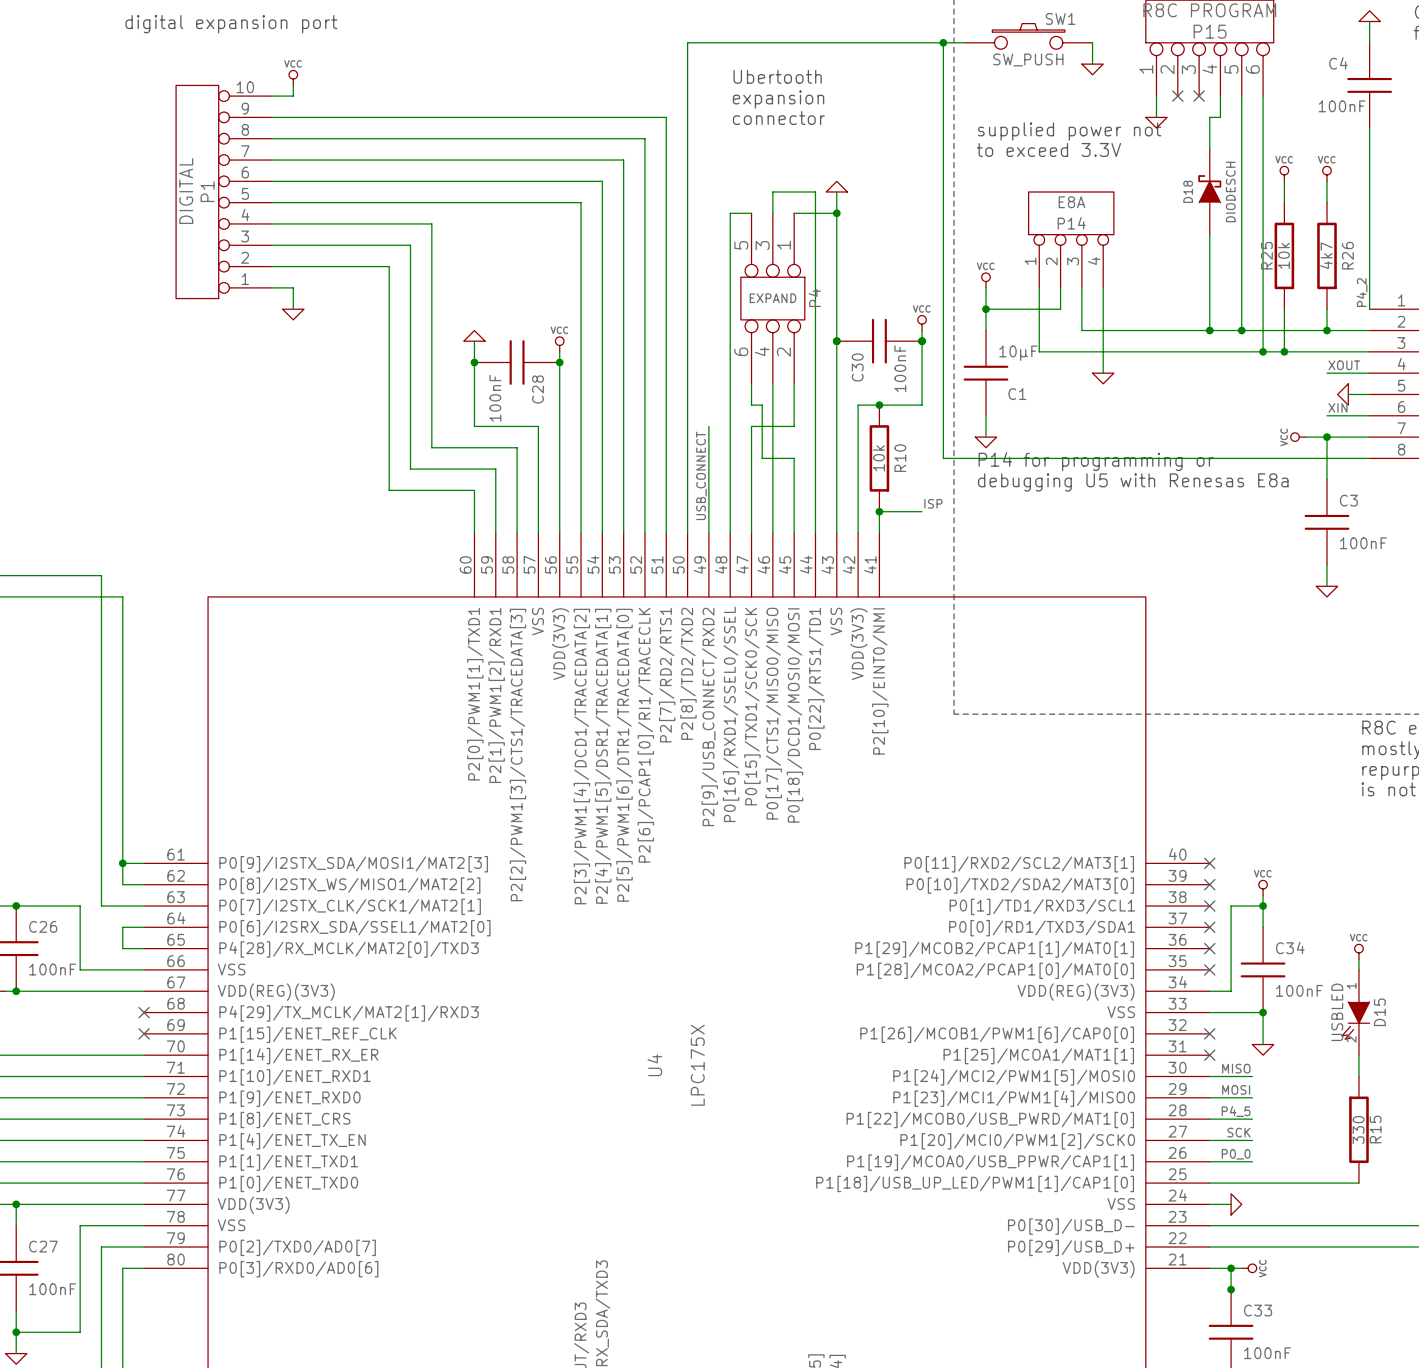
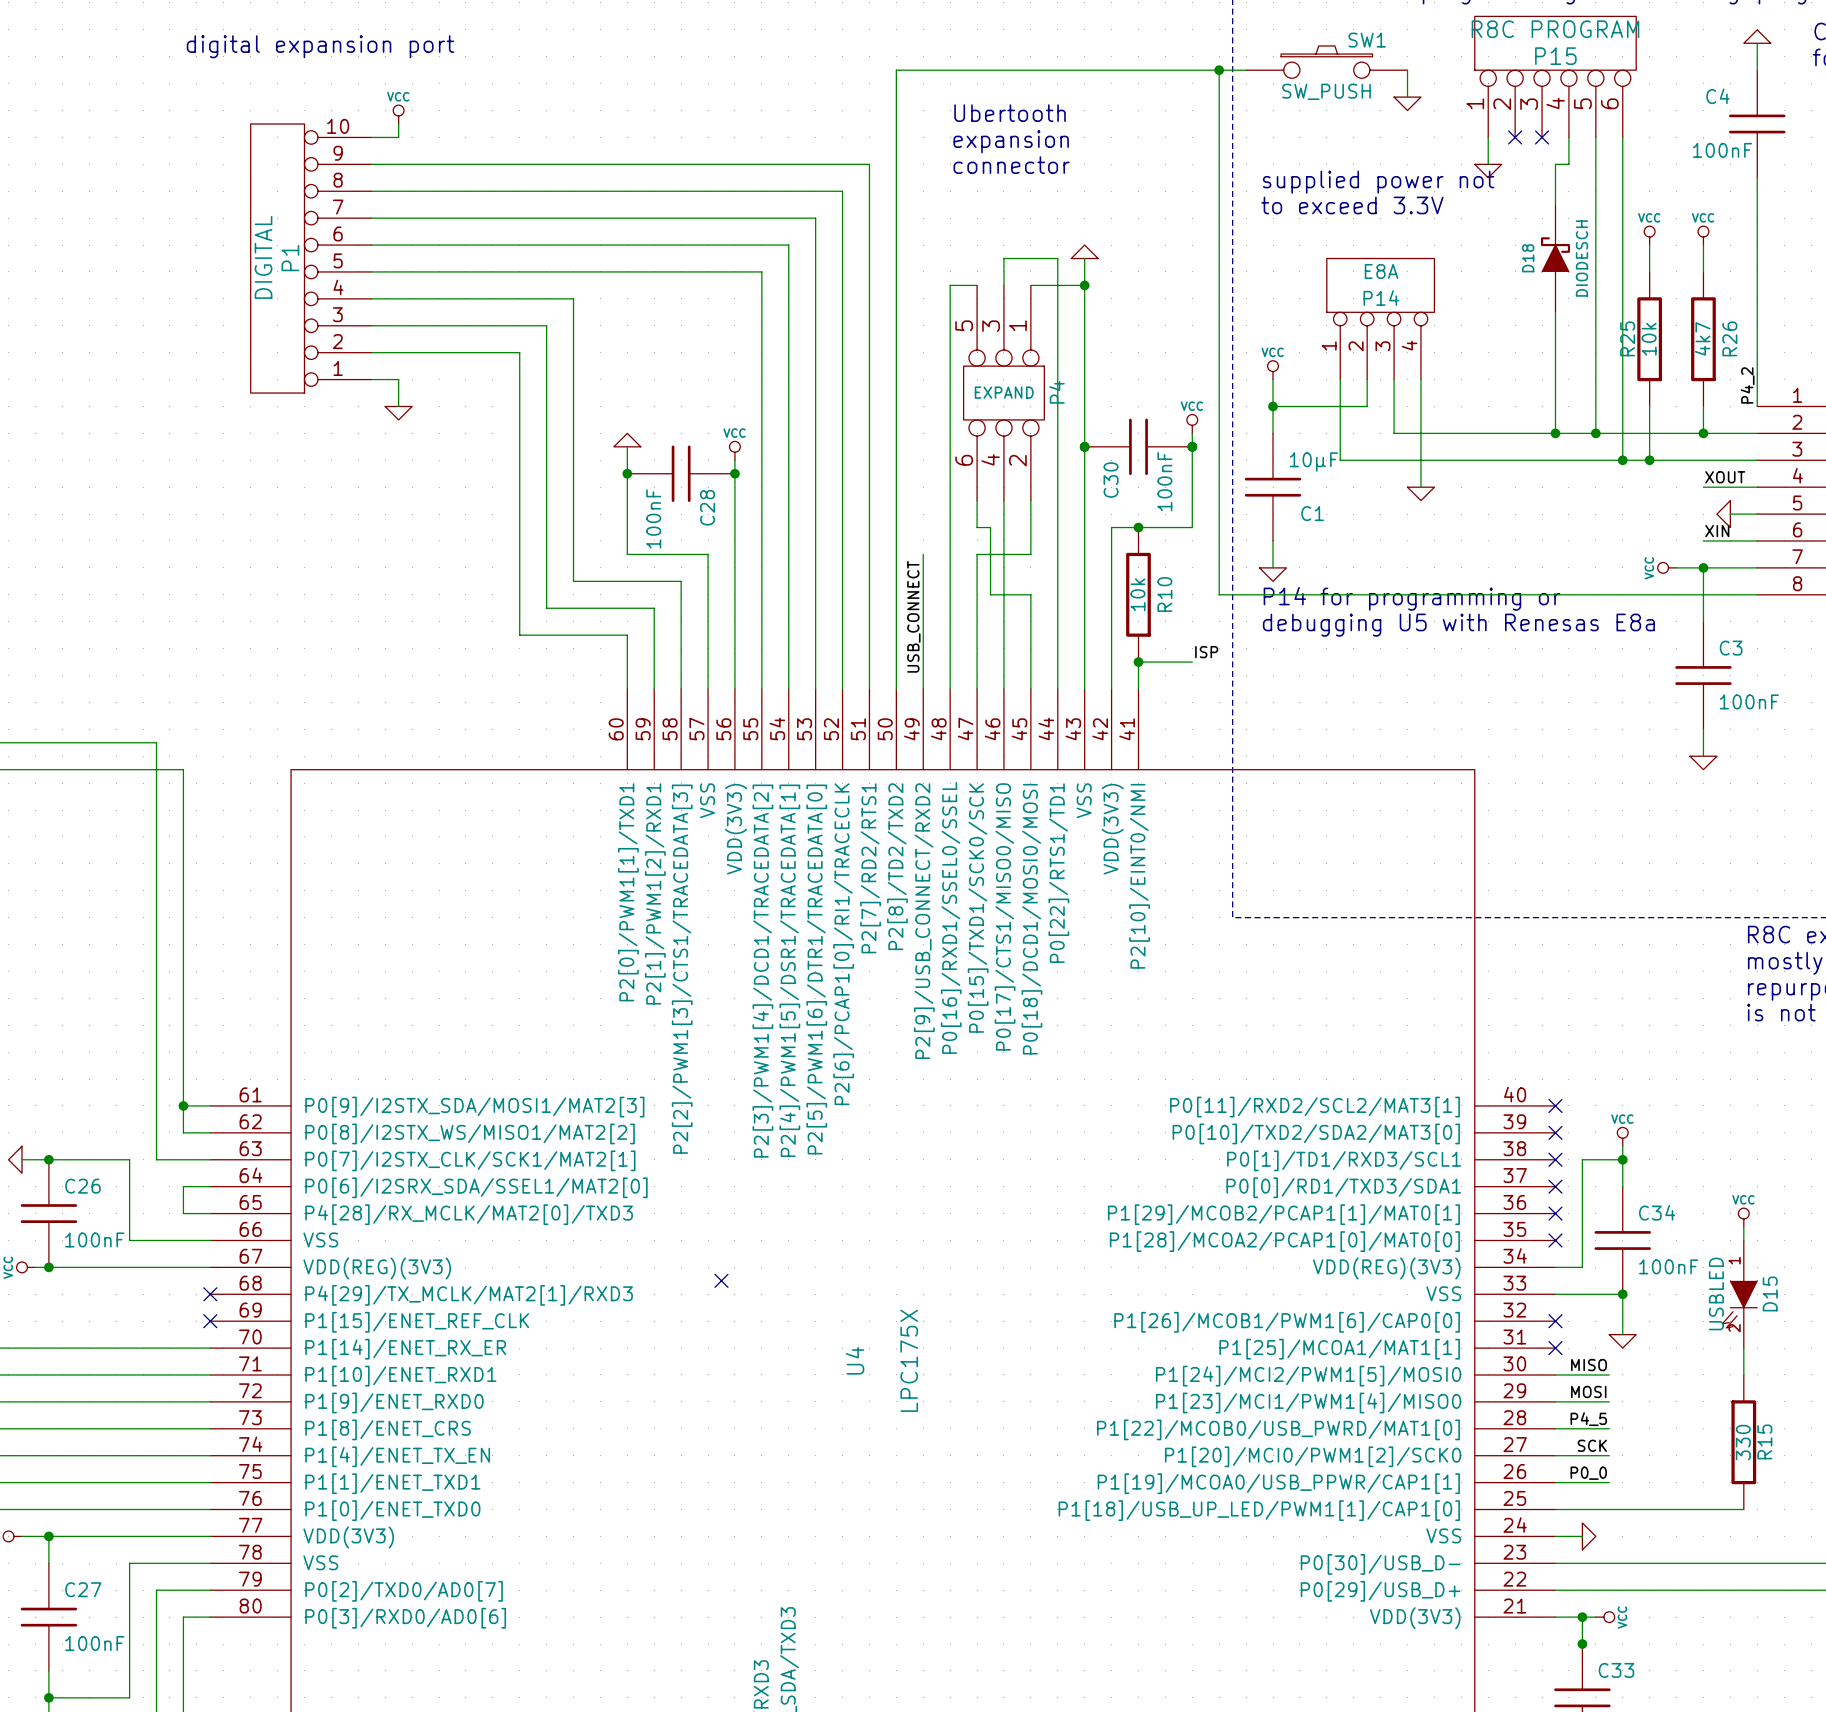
no-connect mark: none -> (721, 1280)

